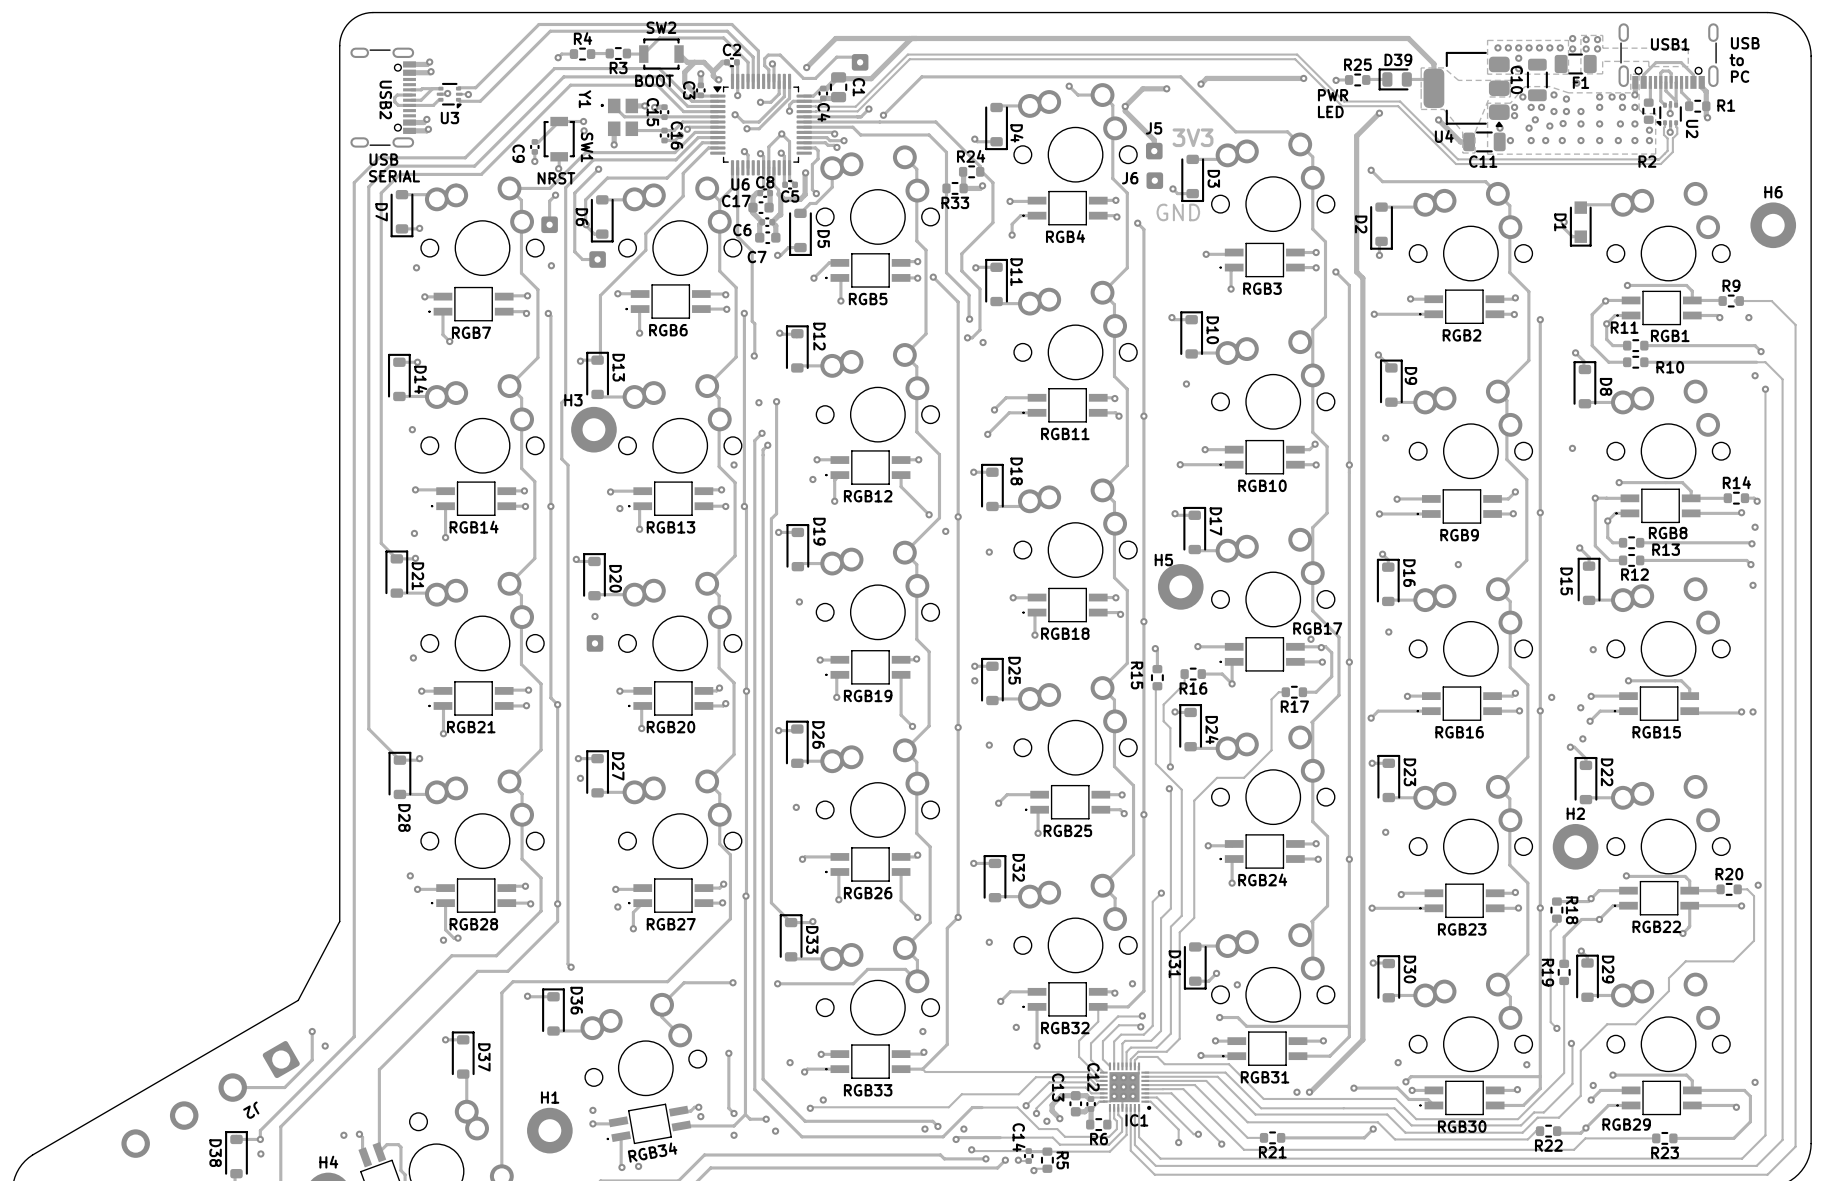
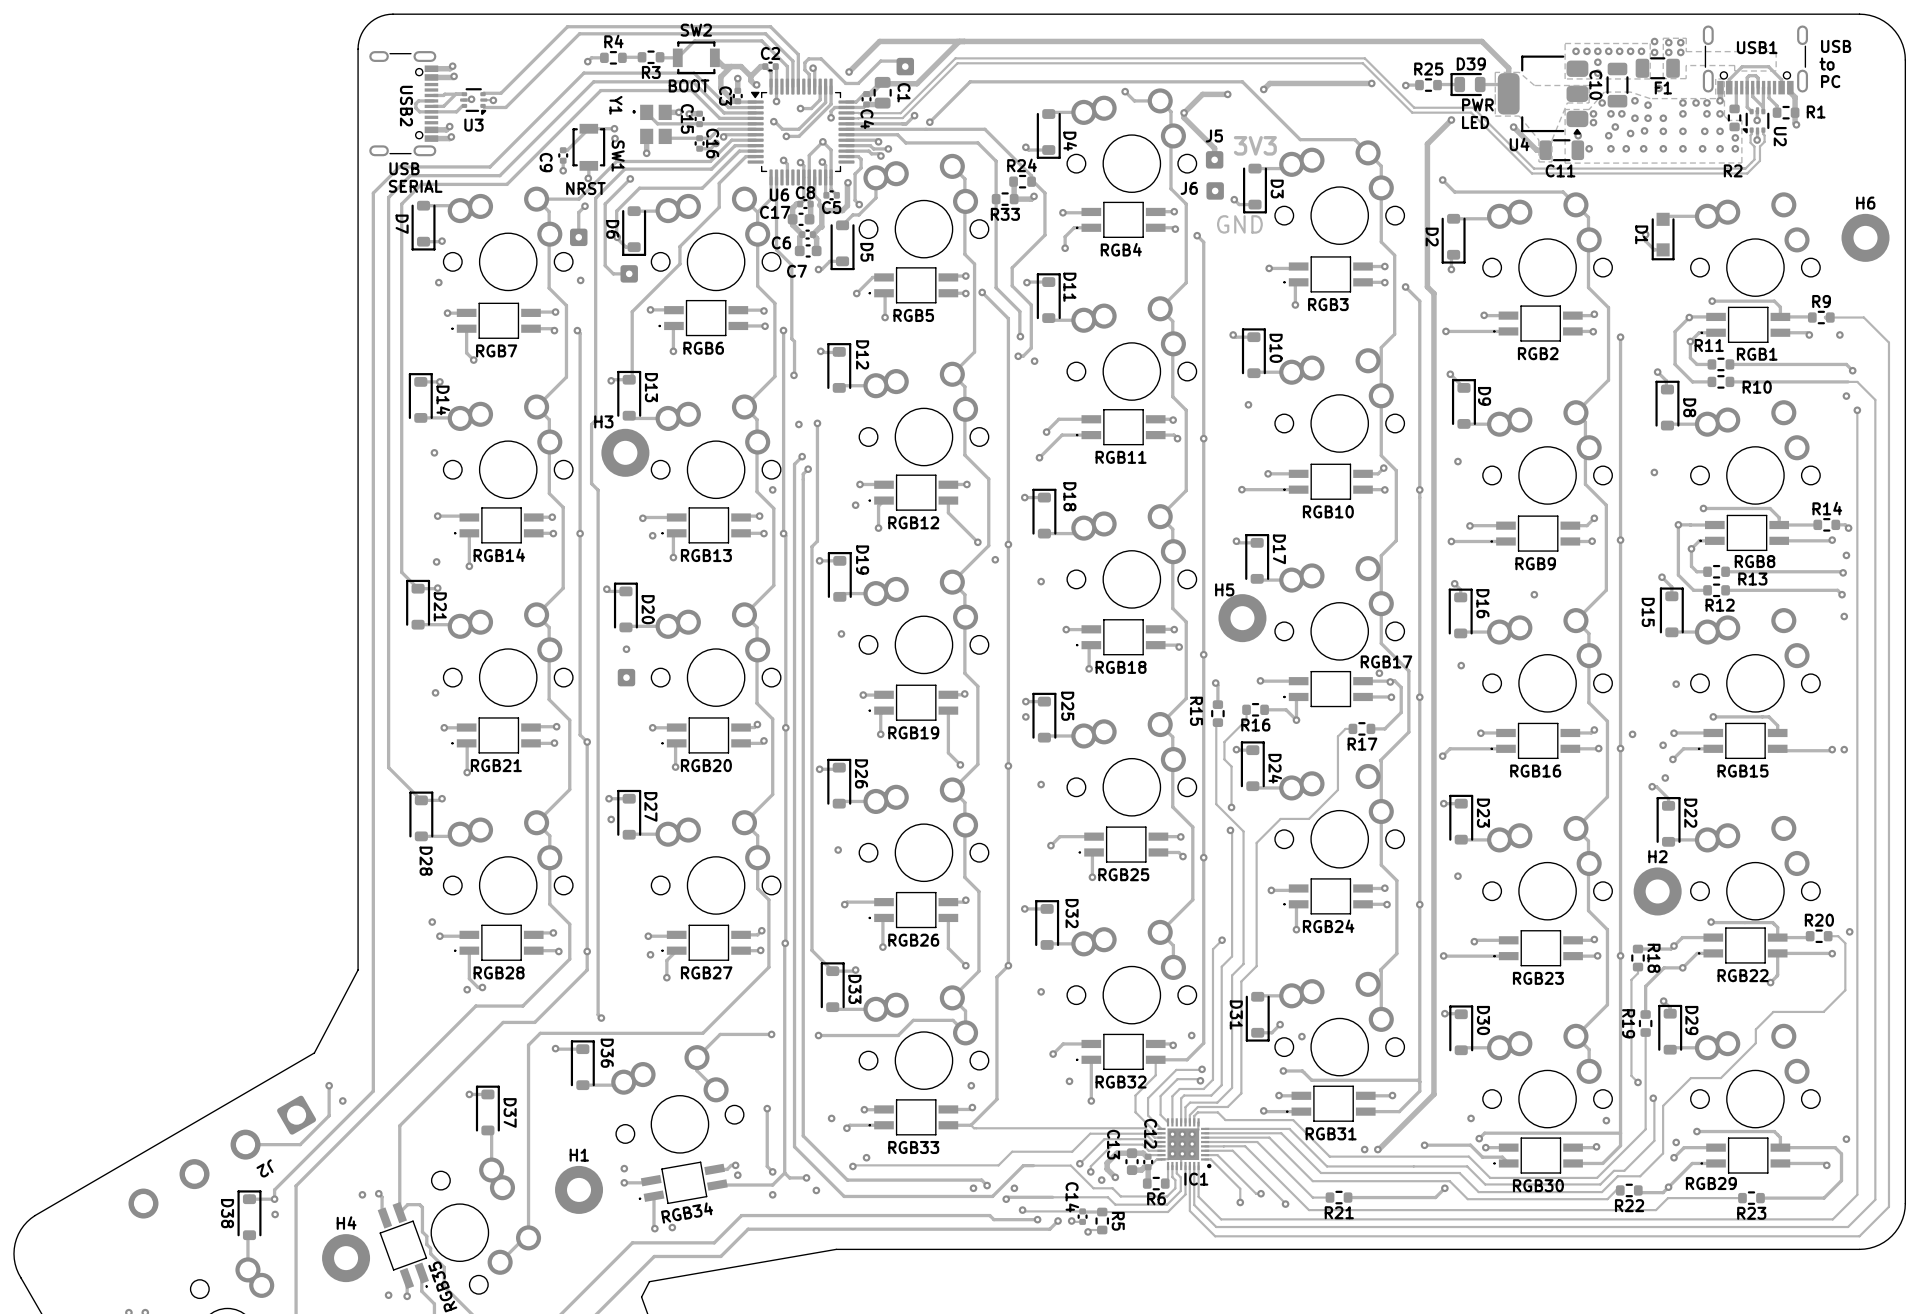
text position: PWR (1333, 95) -> PWR (1477, 104)
text position: LED (1330, 111) -> LED (1475, 122)

